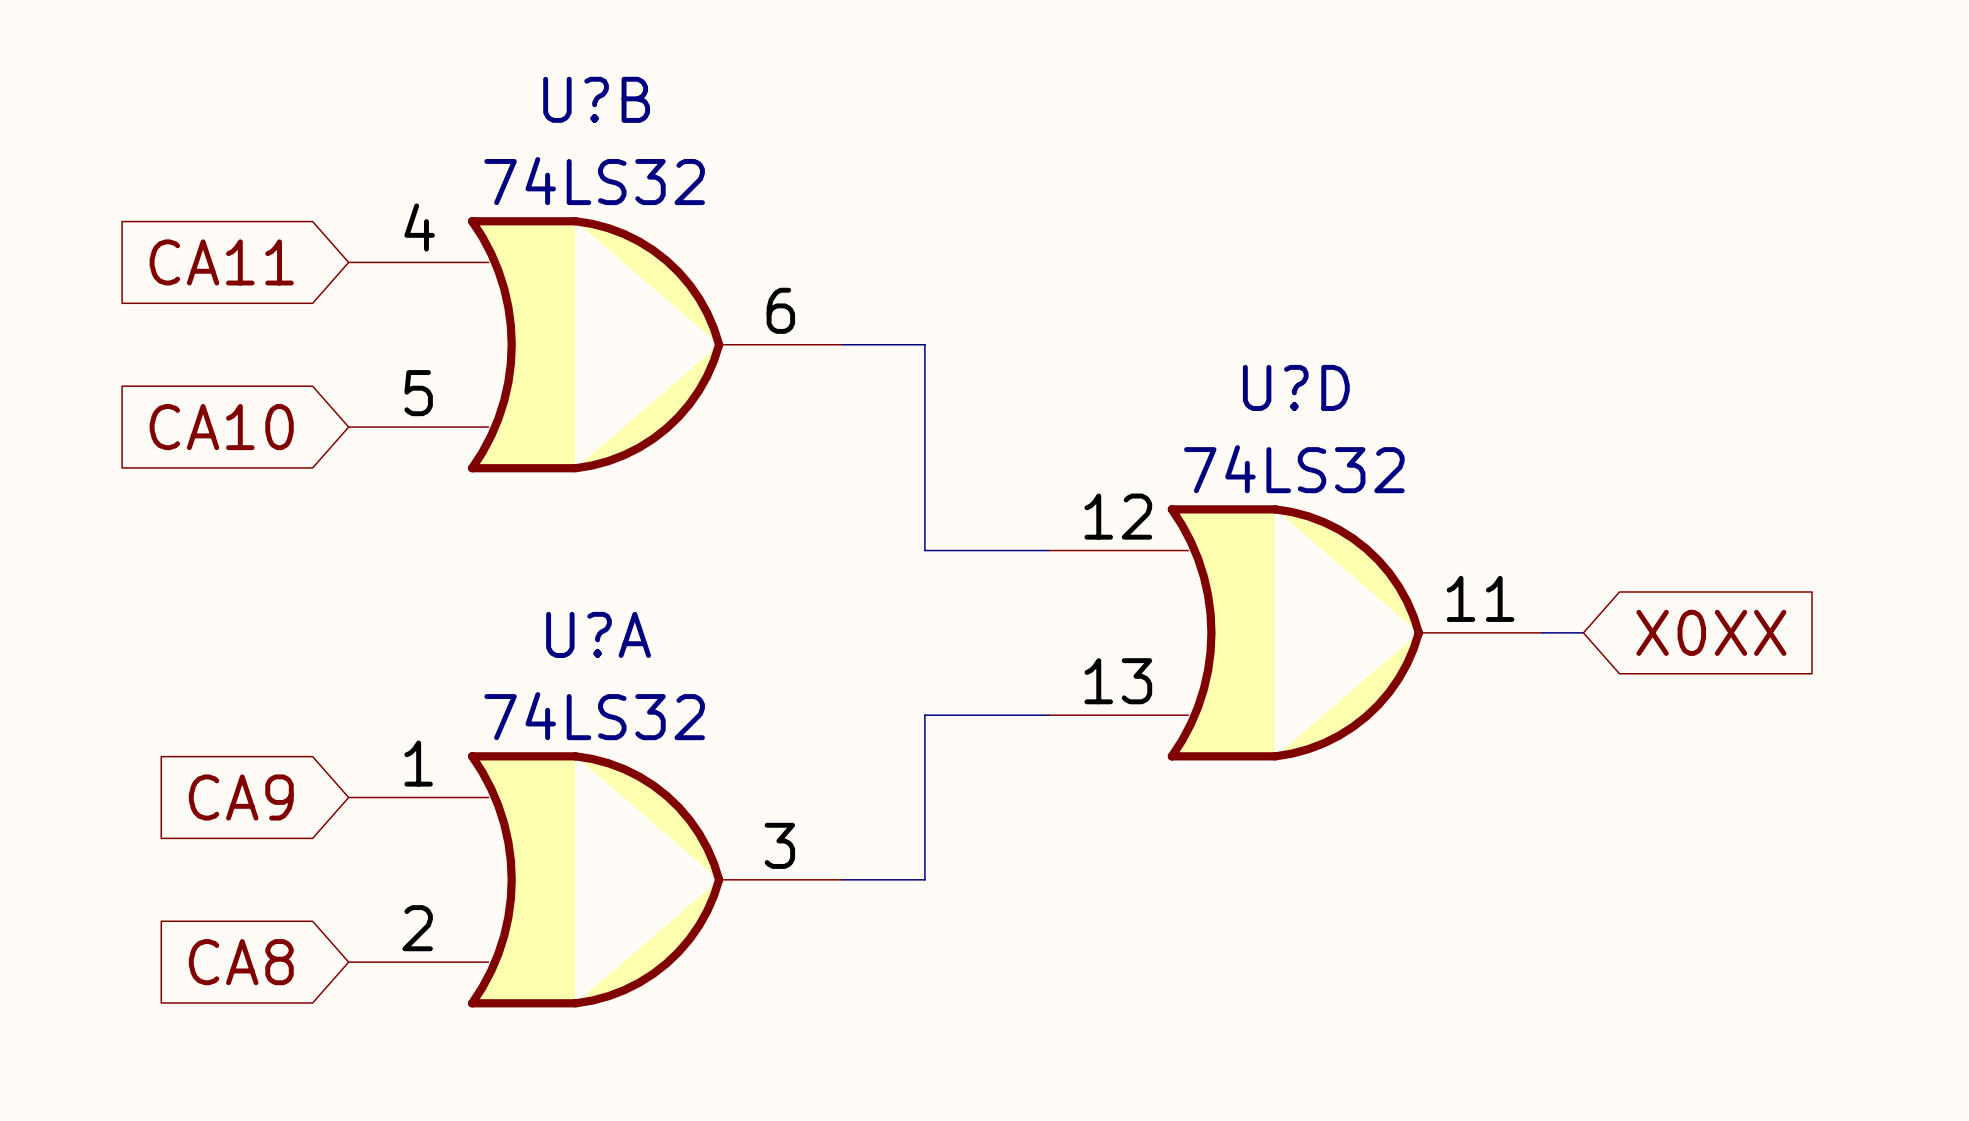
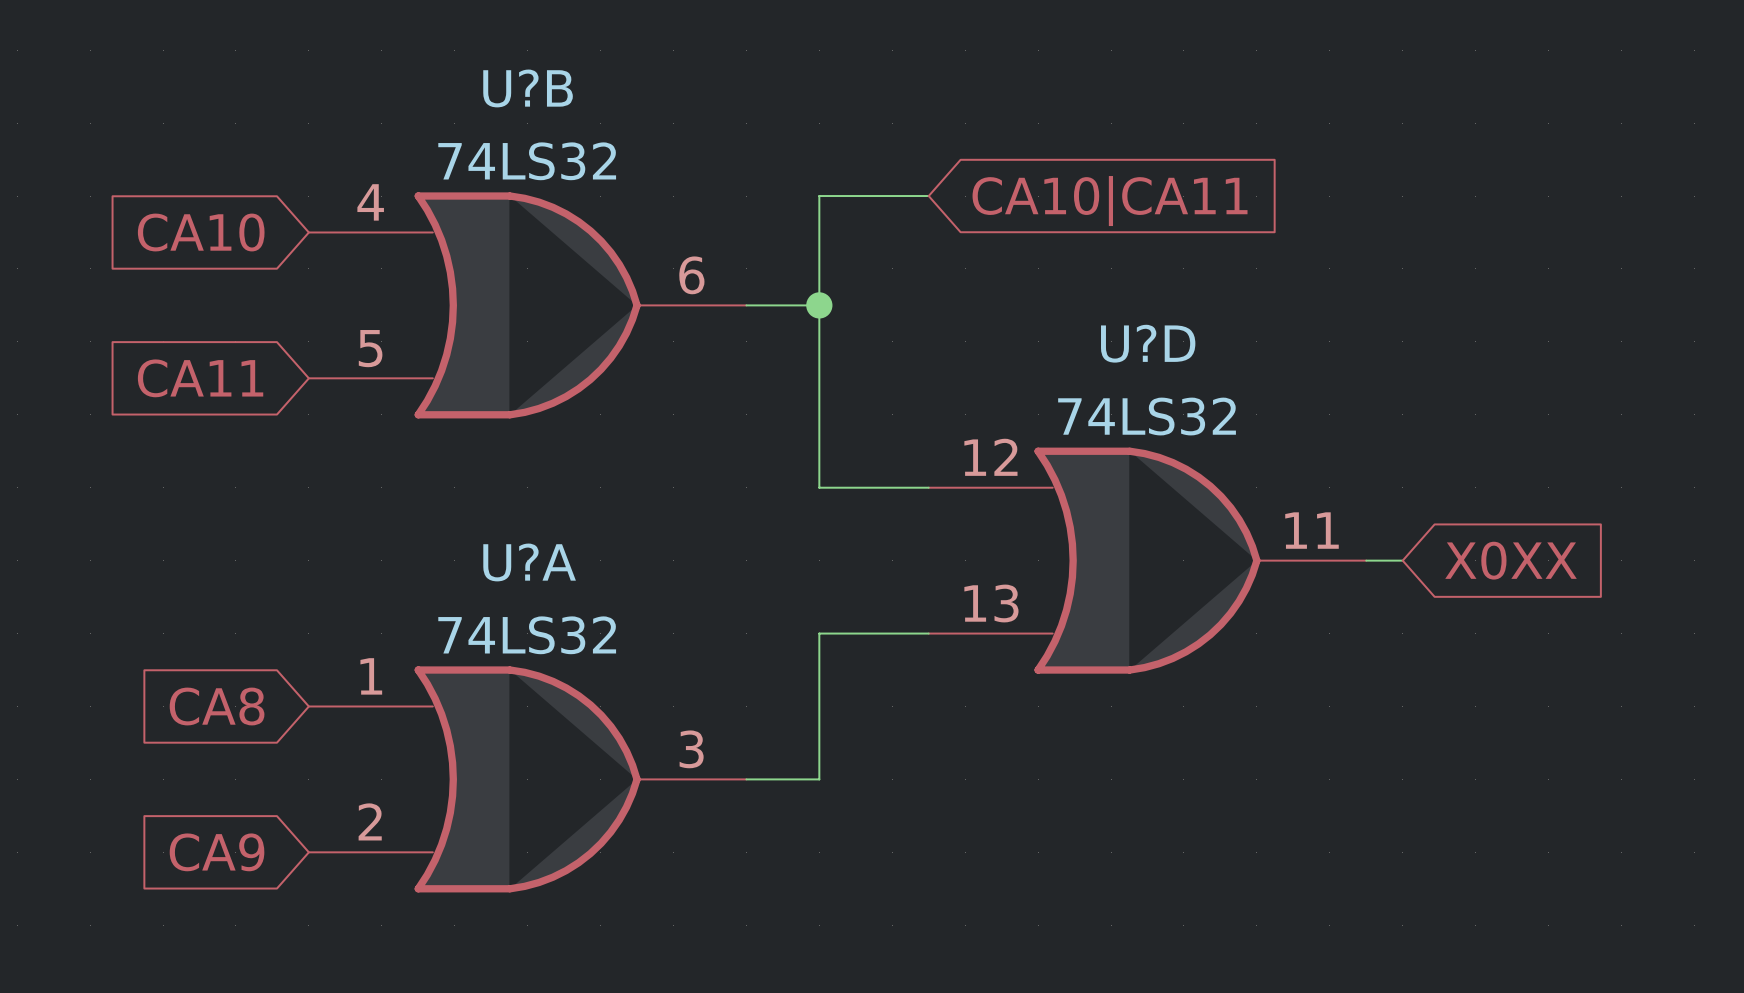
wire: none -> (928, 196) (819, 196) (819, 305)
global label: none -> CA10|CA11 (1110, 201)
global label: CA11 (221, 262) -> CA10 (201, 232)
junction: none -> (819, 305)
global label: CA10 (221, 427) -> CA11 (200, 378)
global label: CA9 (241, 797) -> CA8 (217, 706)
global label: CA8 (241, 962) -> CA9 (217, 852)

